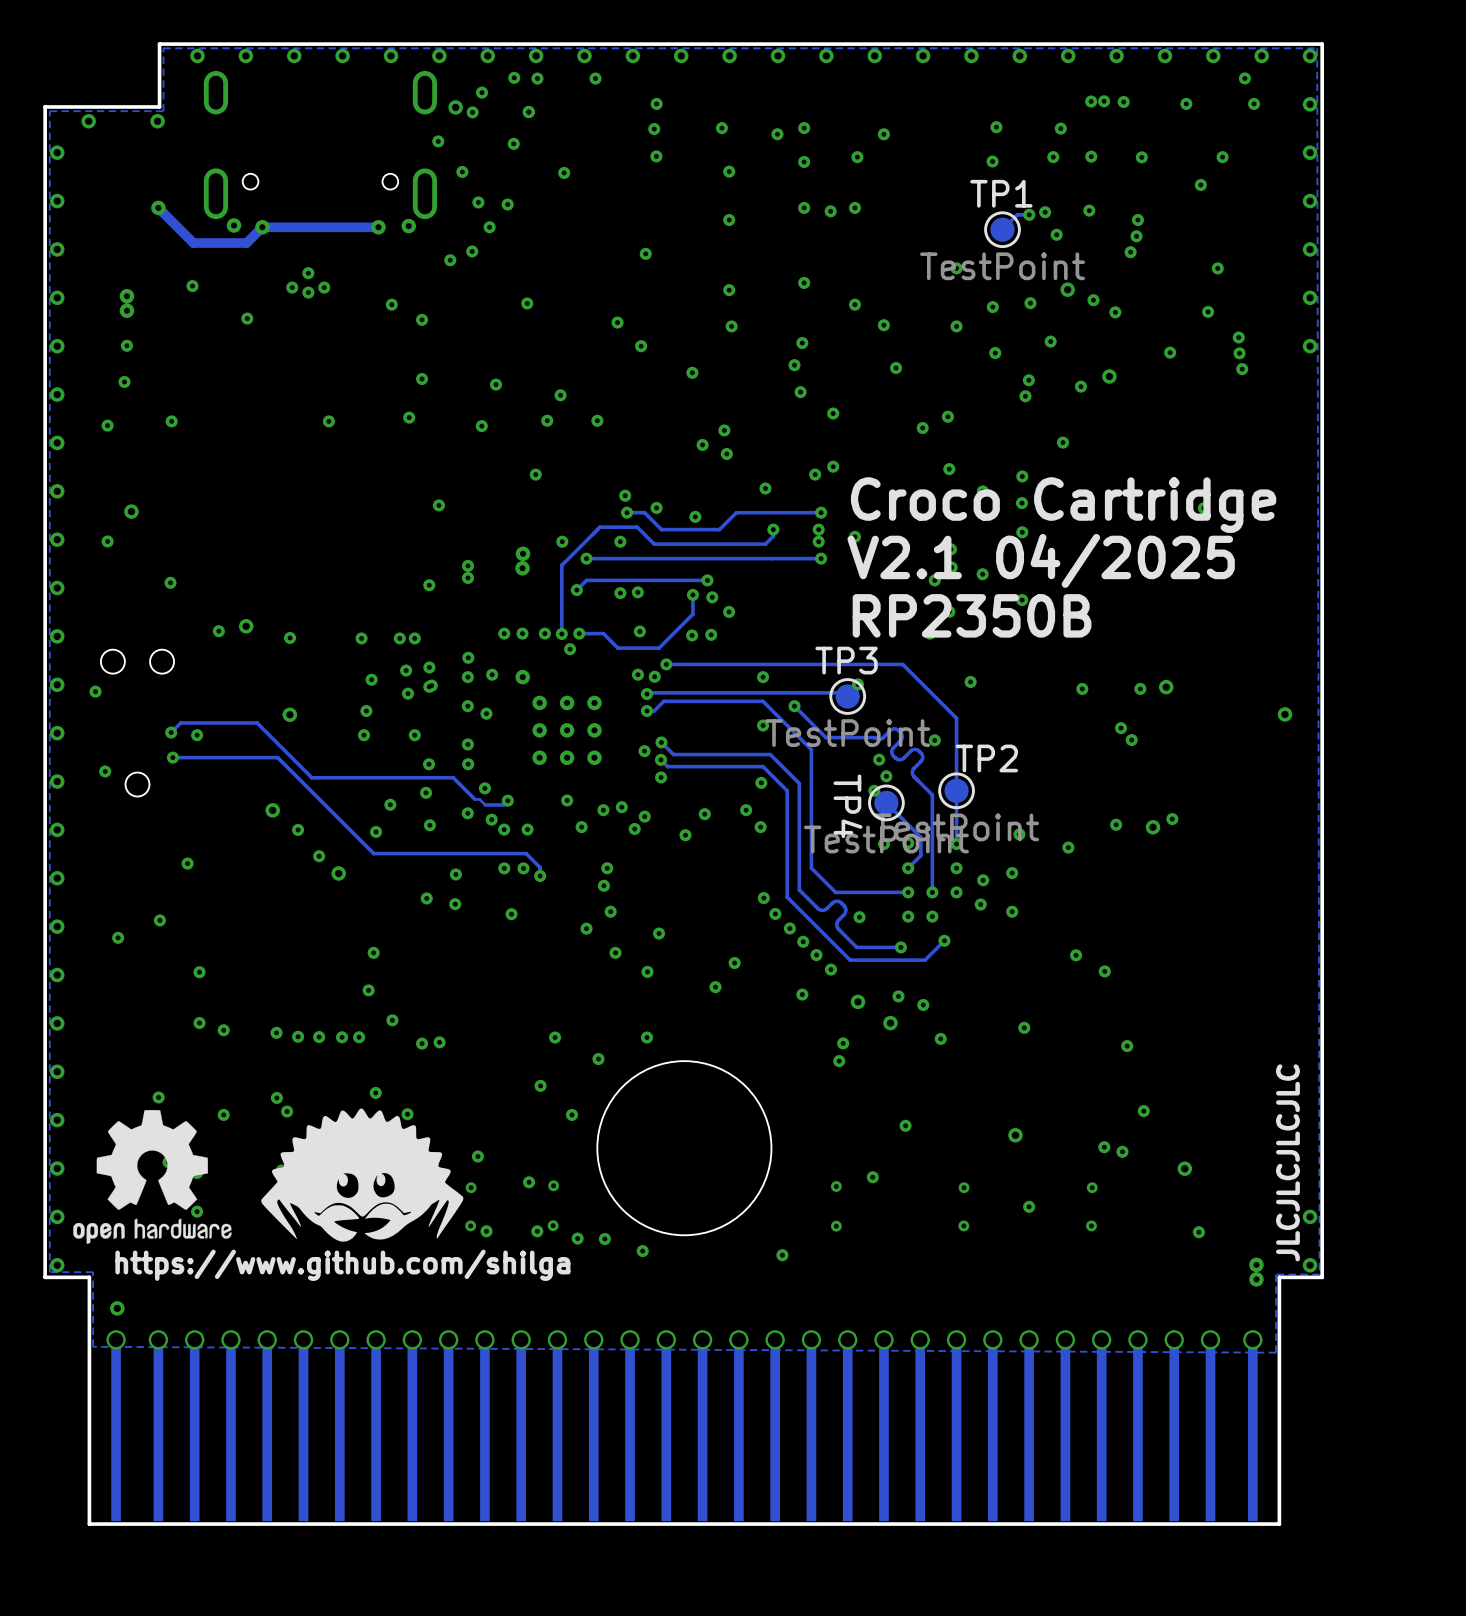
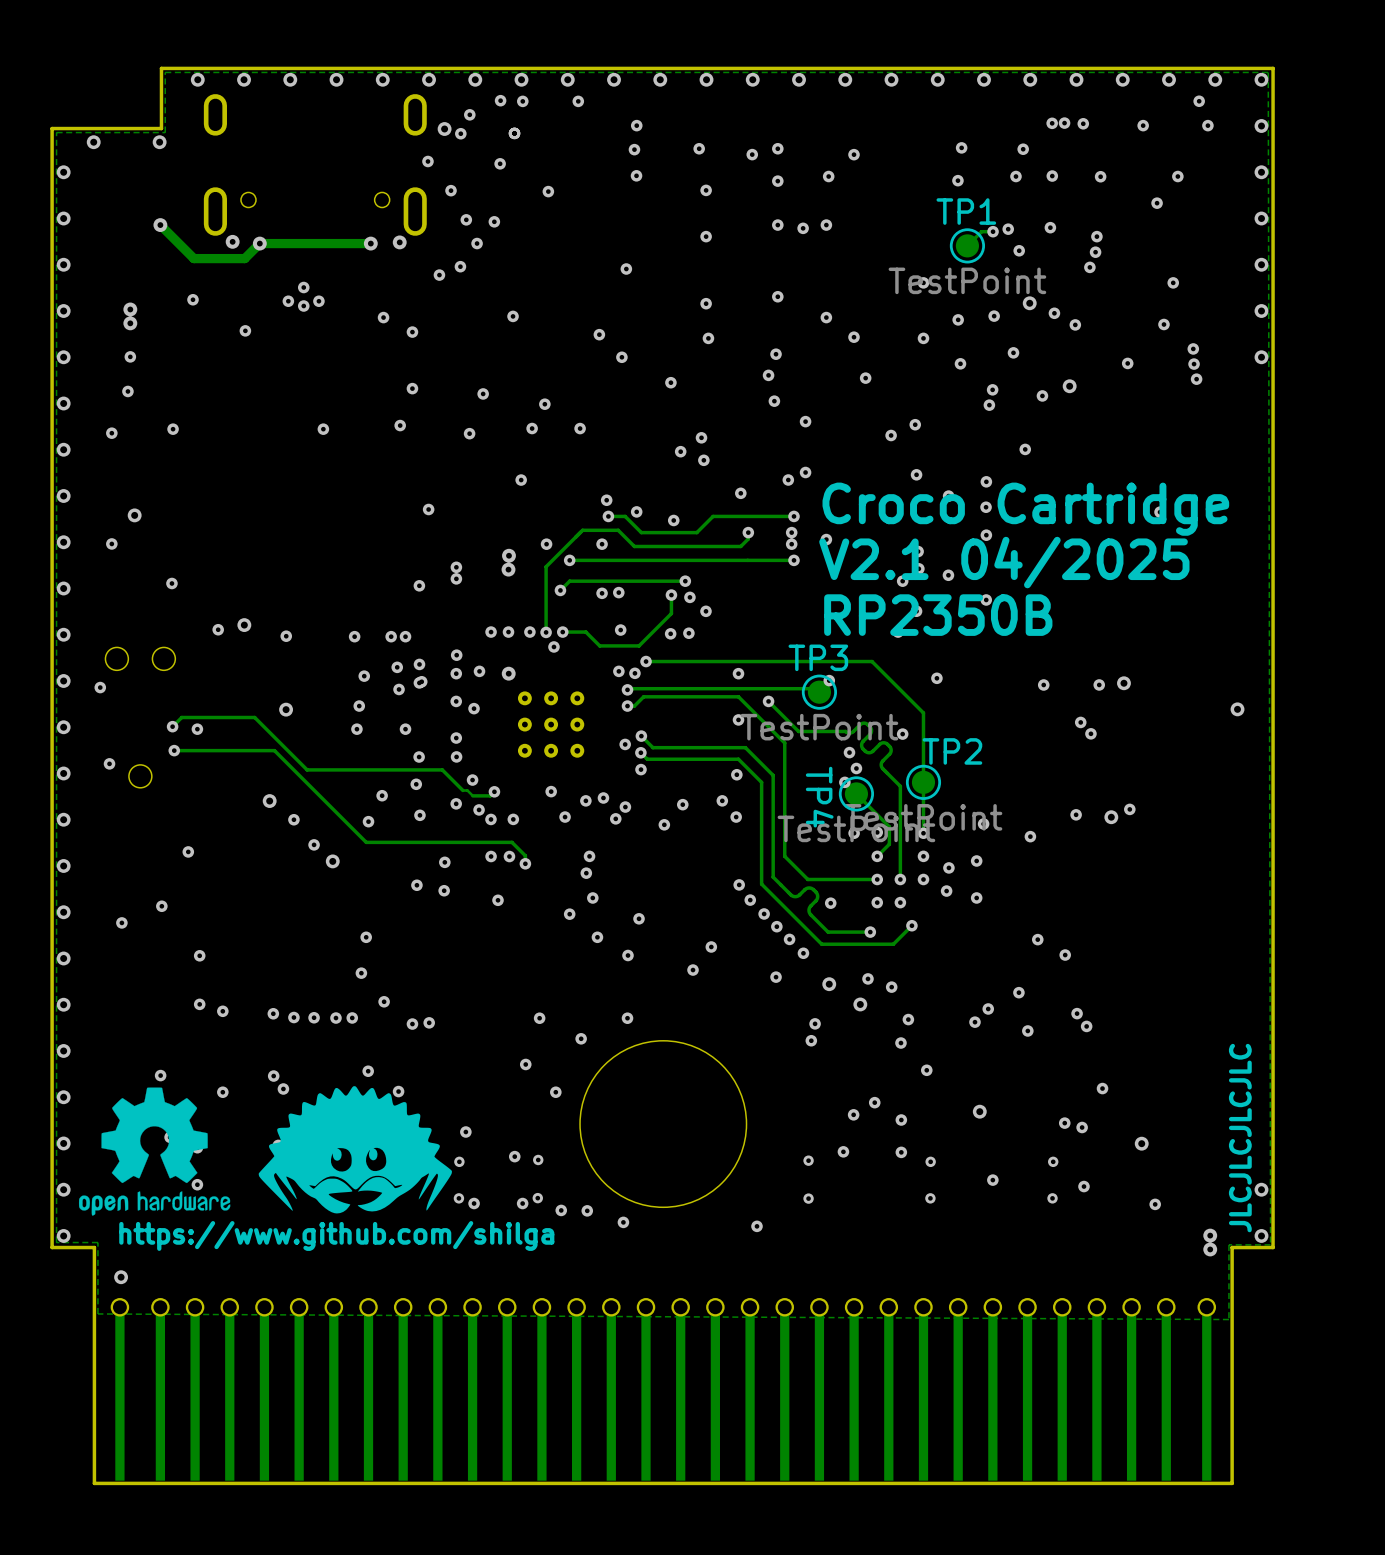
via: none -> (1018, 992)
via: none -> (1077, 1013)
via: none -> (974, 1022)
via: none -> (1027, 1030)
via: none -> (900, 1043)
via: none -> (926, 1070)
via: none -> (853, 1114)
via: none -> (901, 1120)
via: none -> (901, 1152)
via: none -> (1083, 1186)

